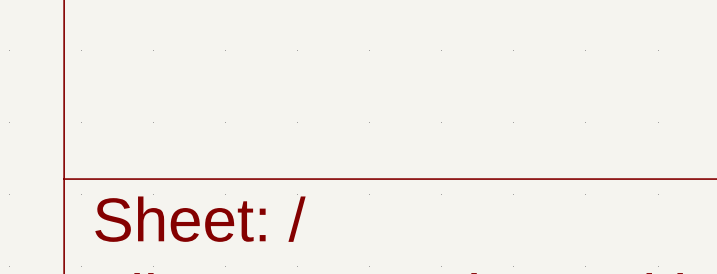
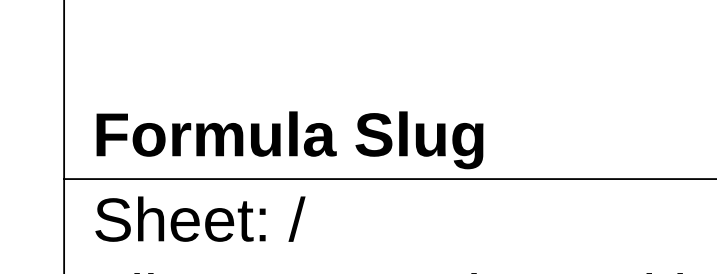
title block: none -> Formula Slug (290, 140)

